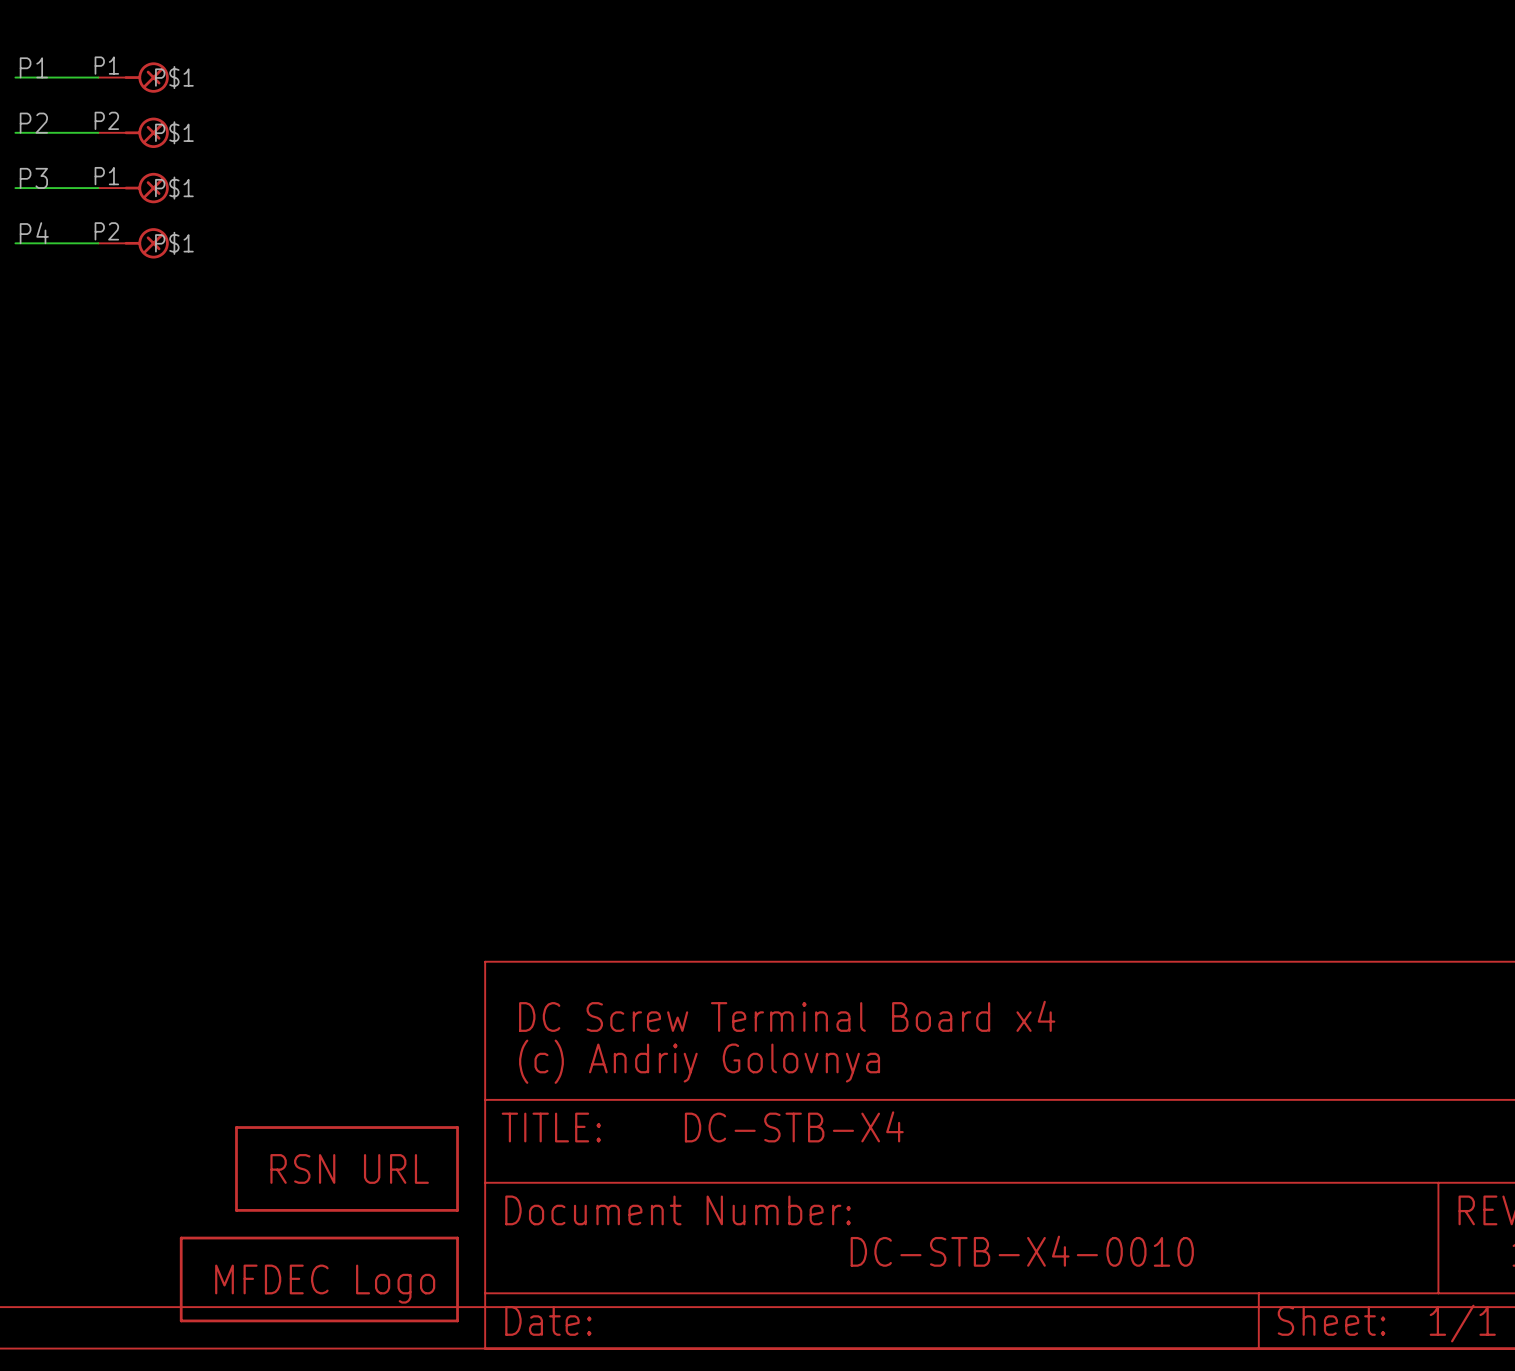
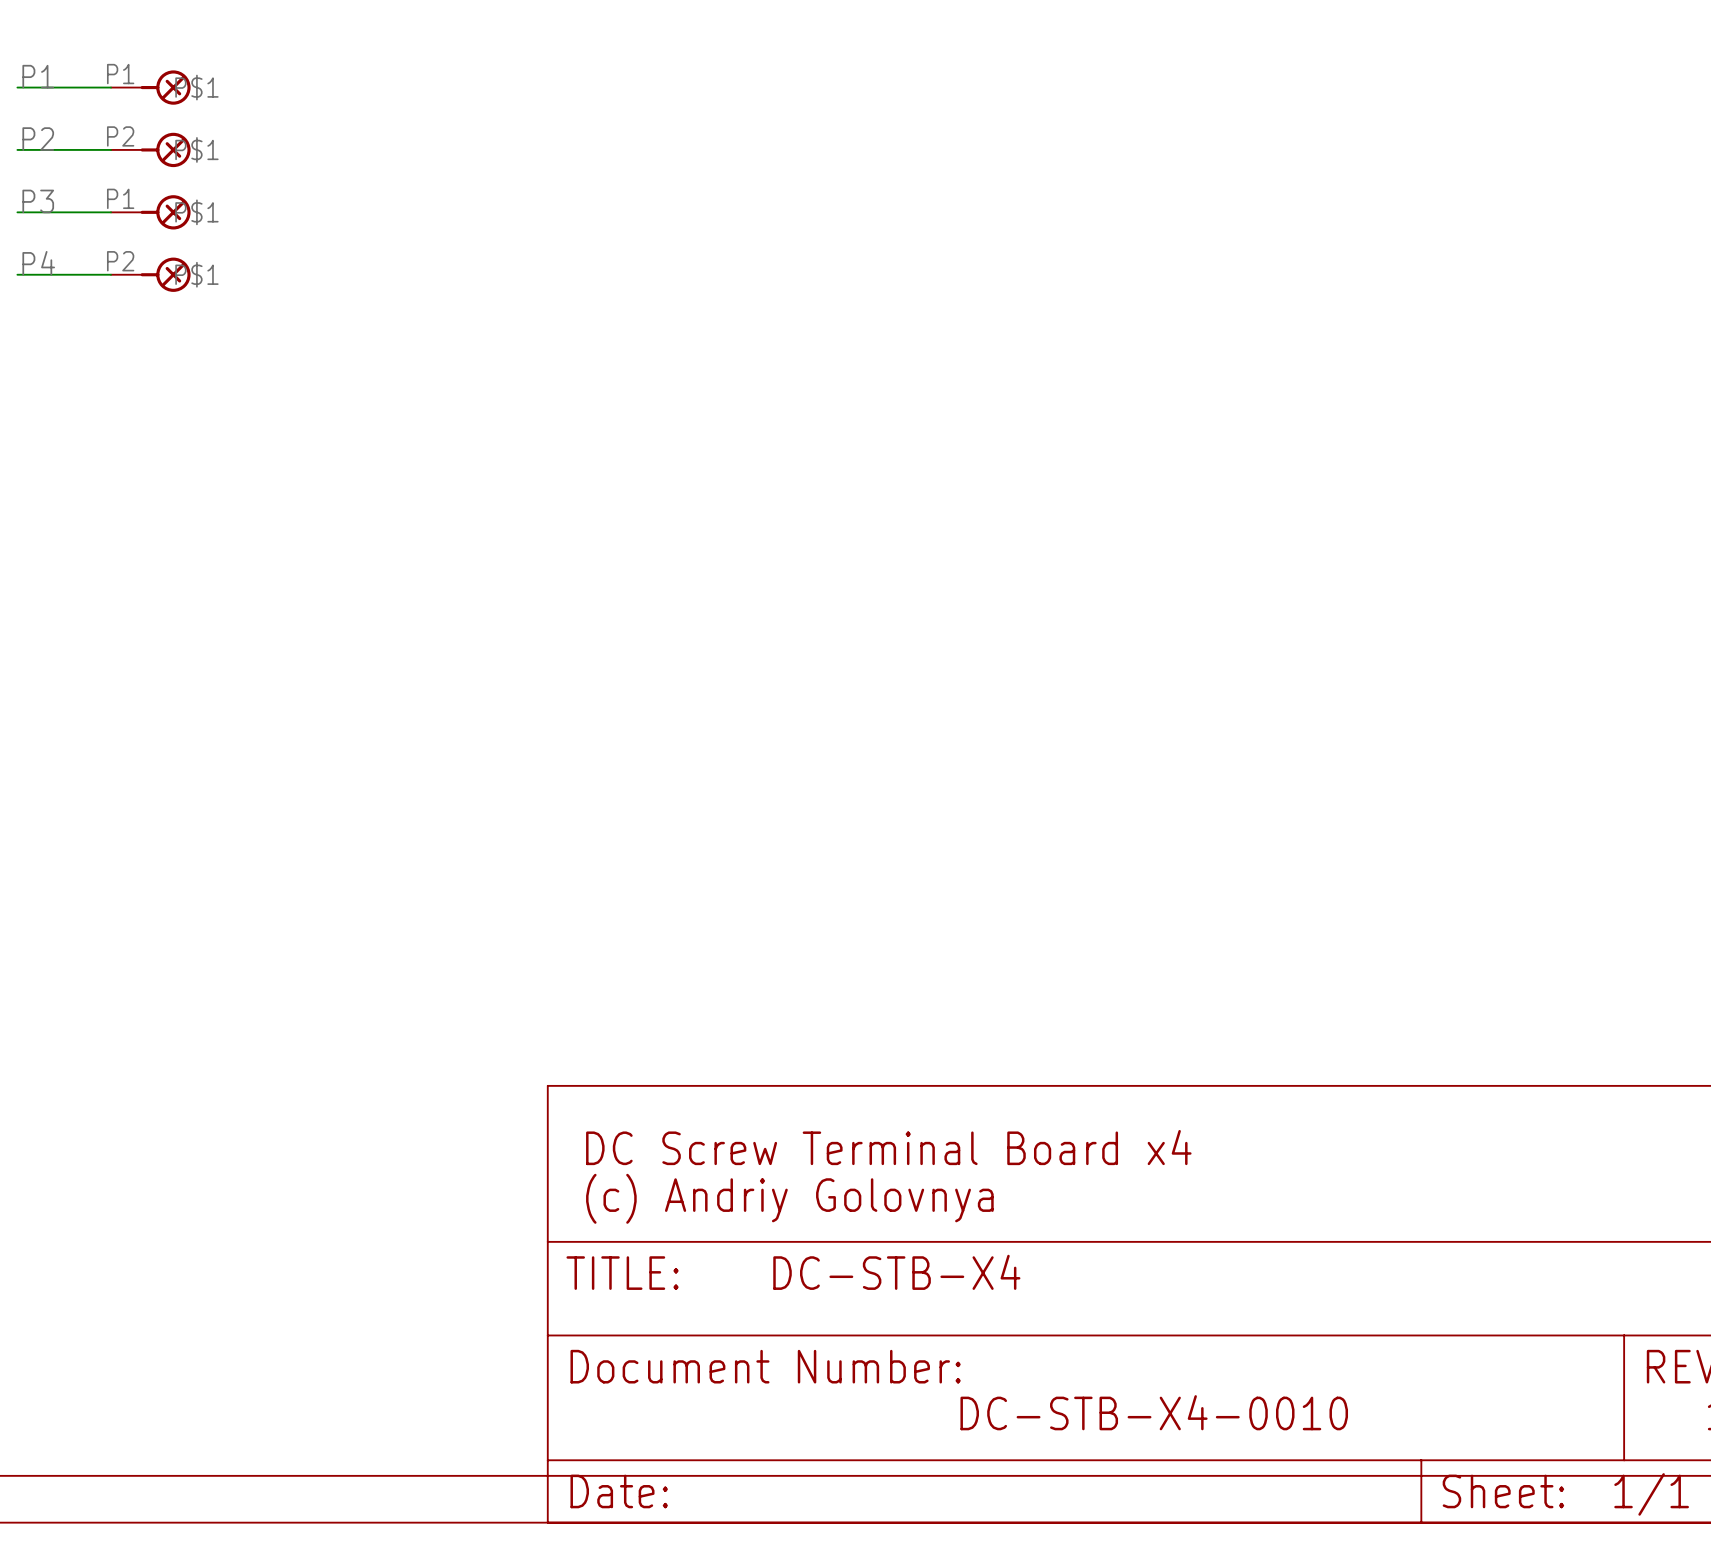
part: (347, 1168) -> none
part: (319, 1279) -> none

